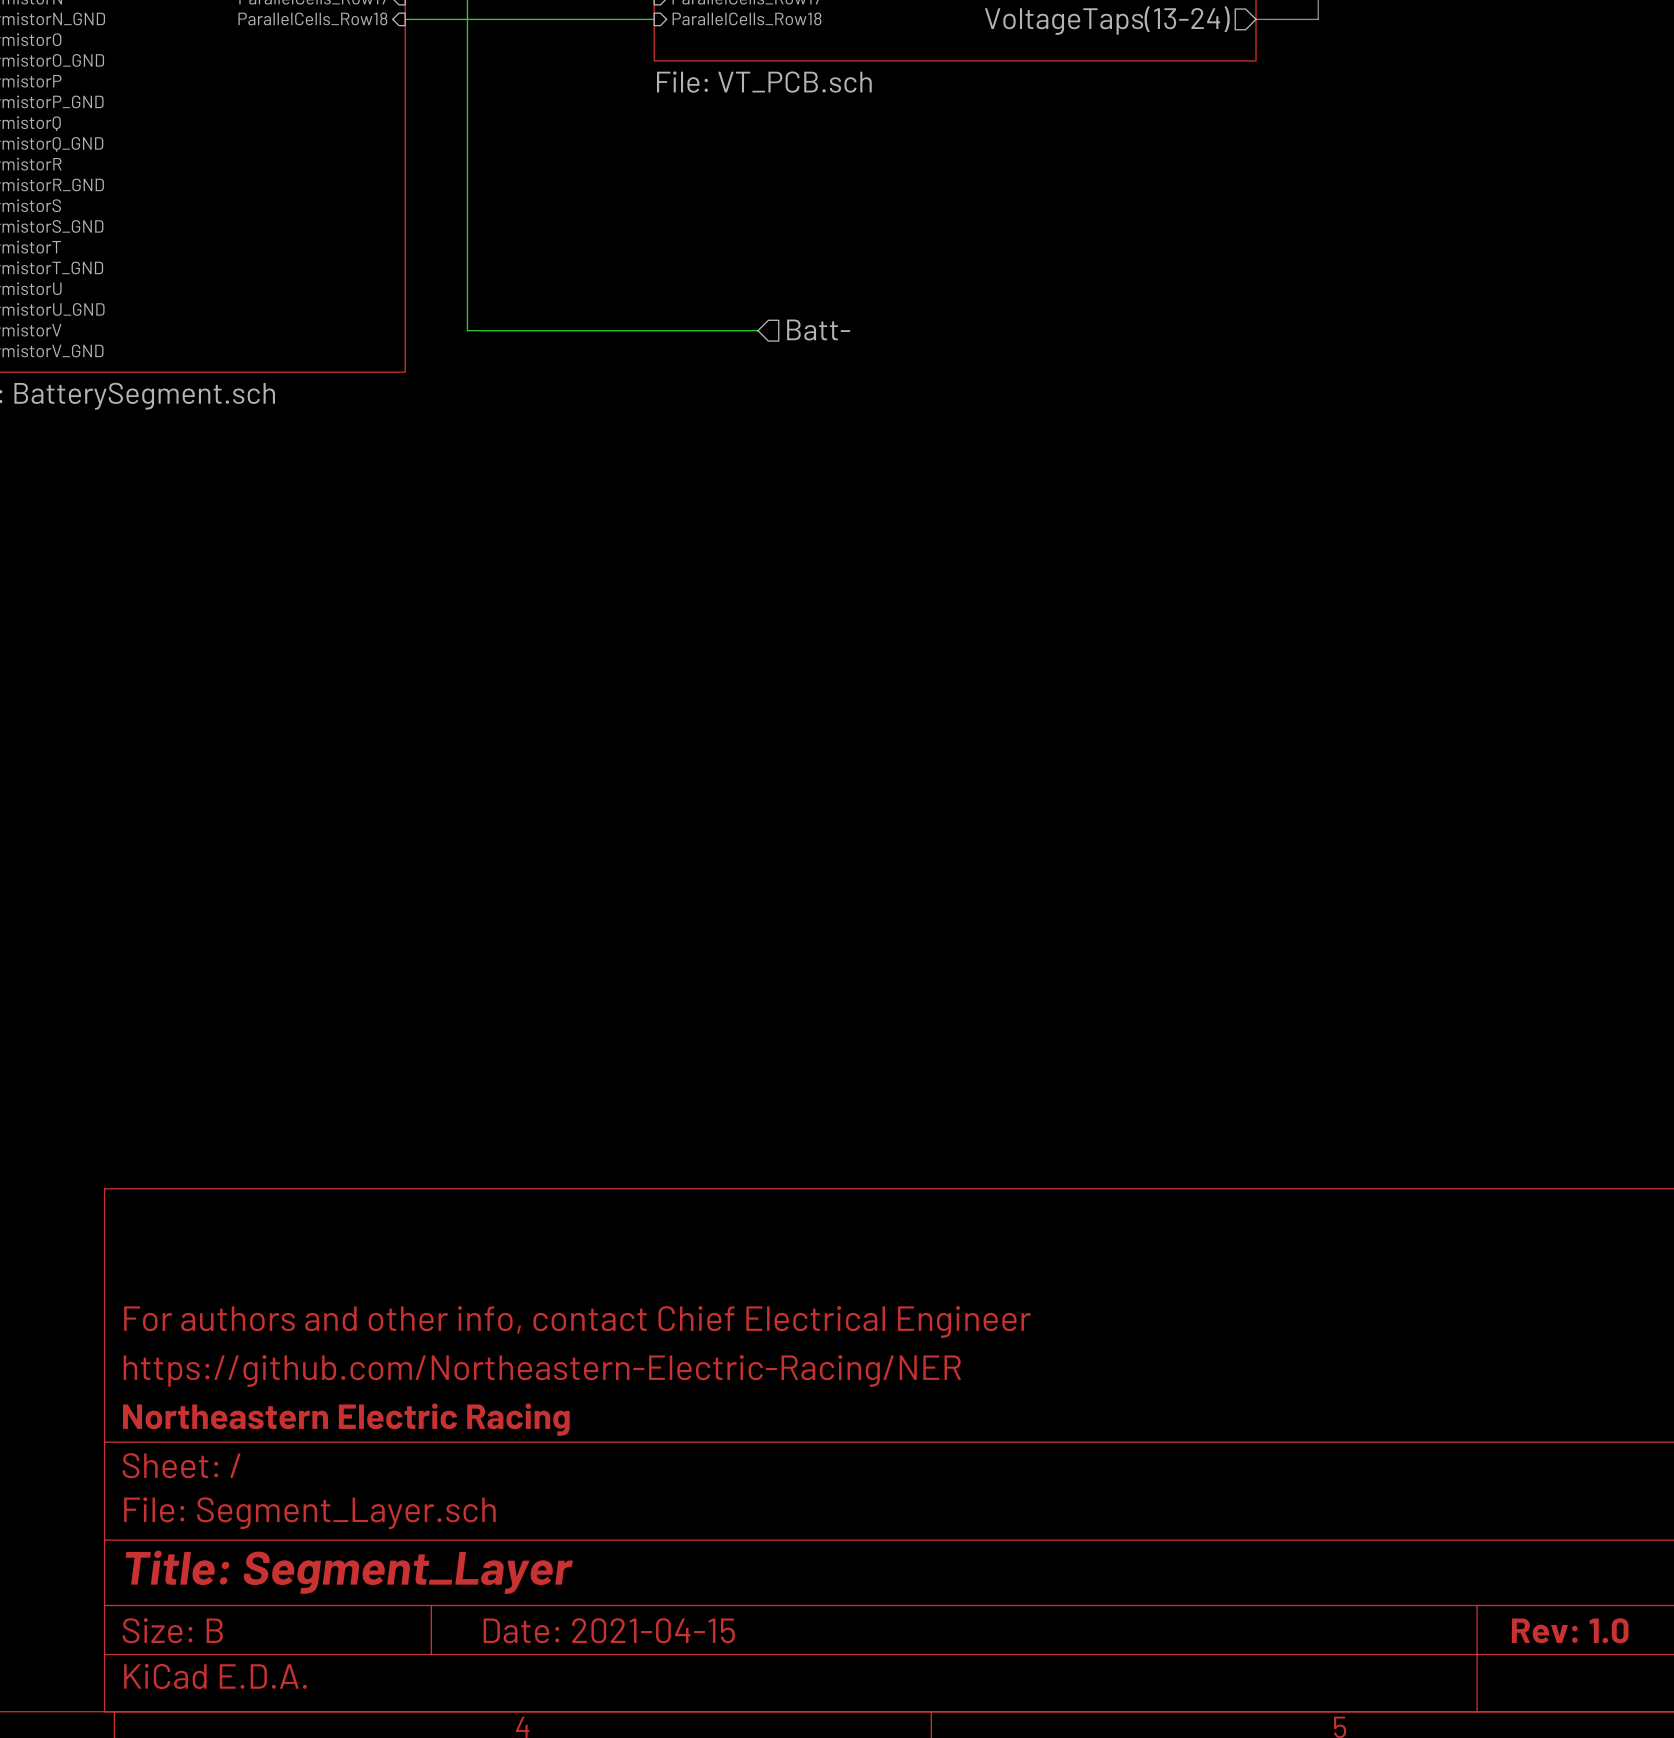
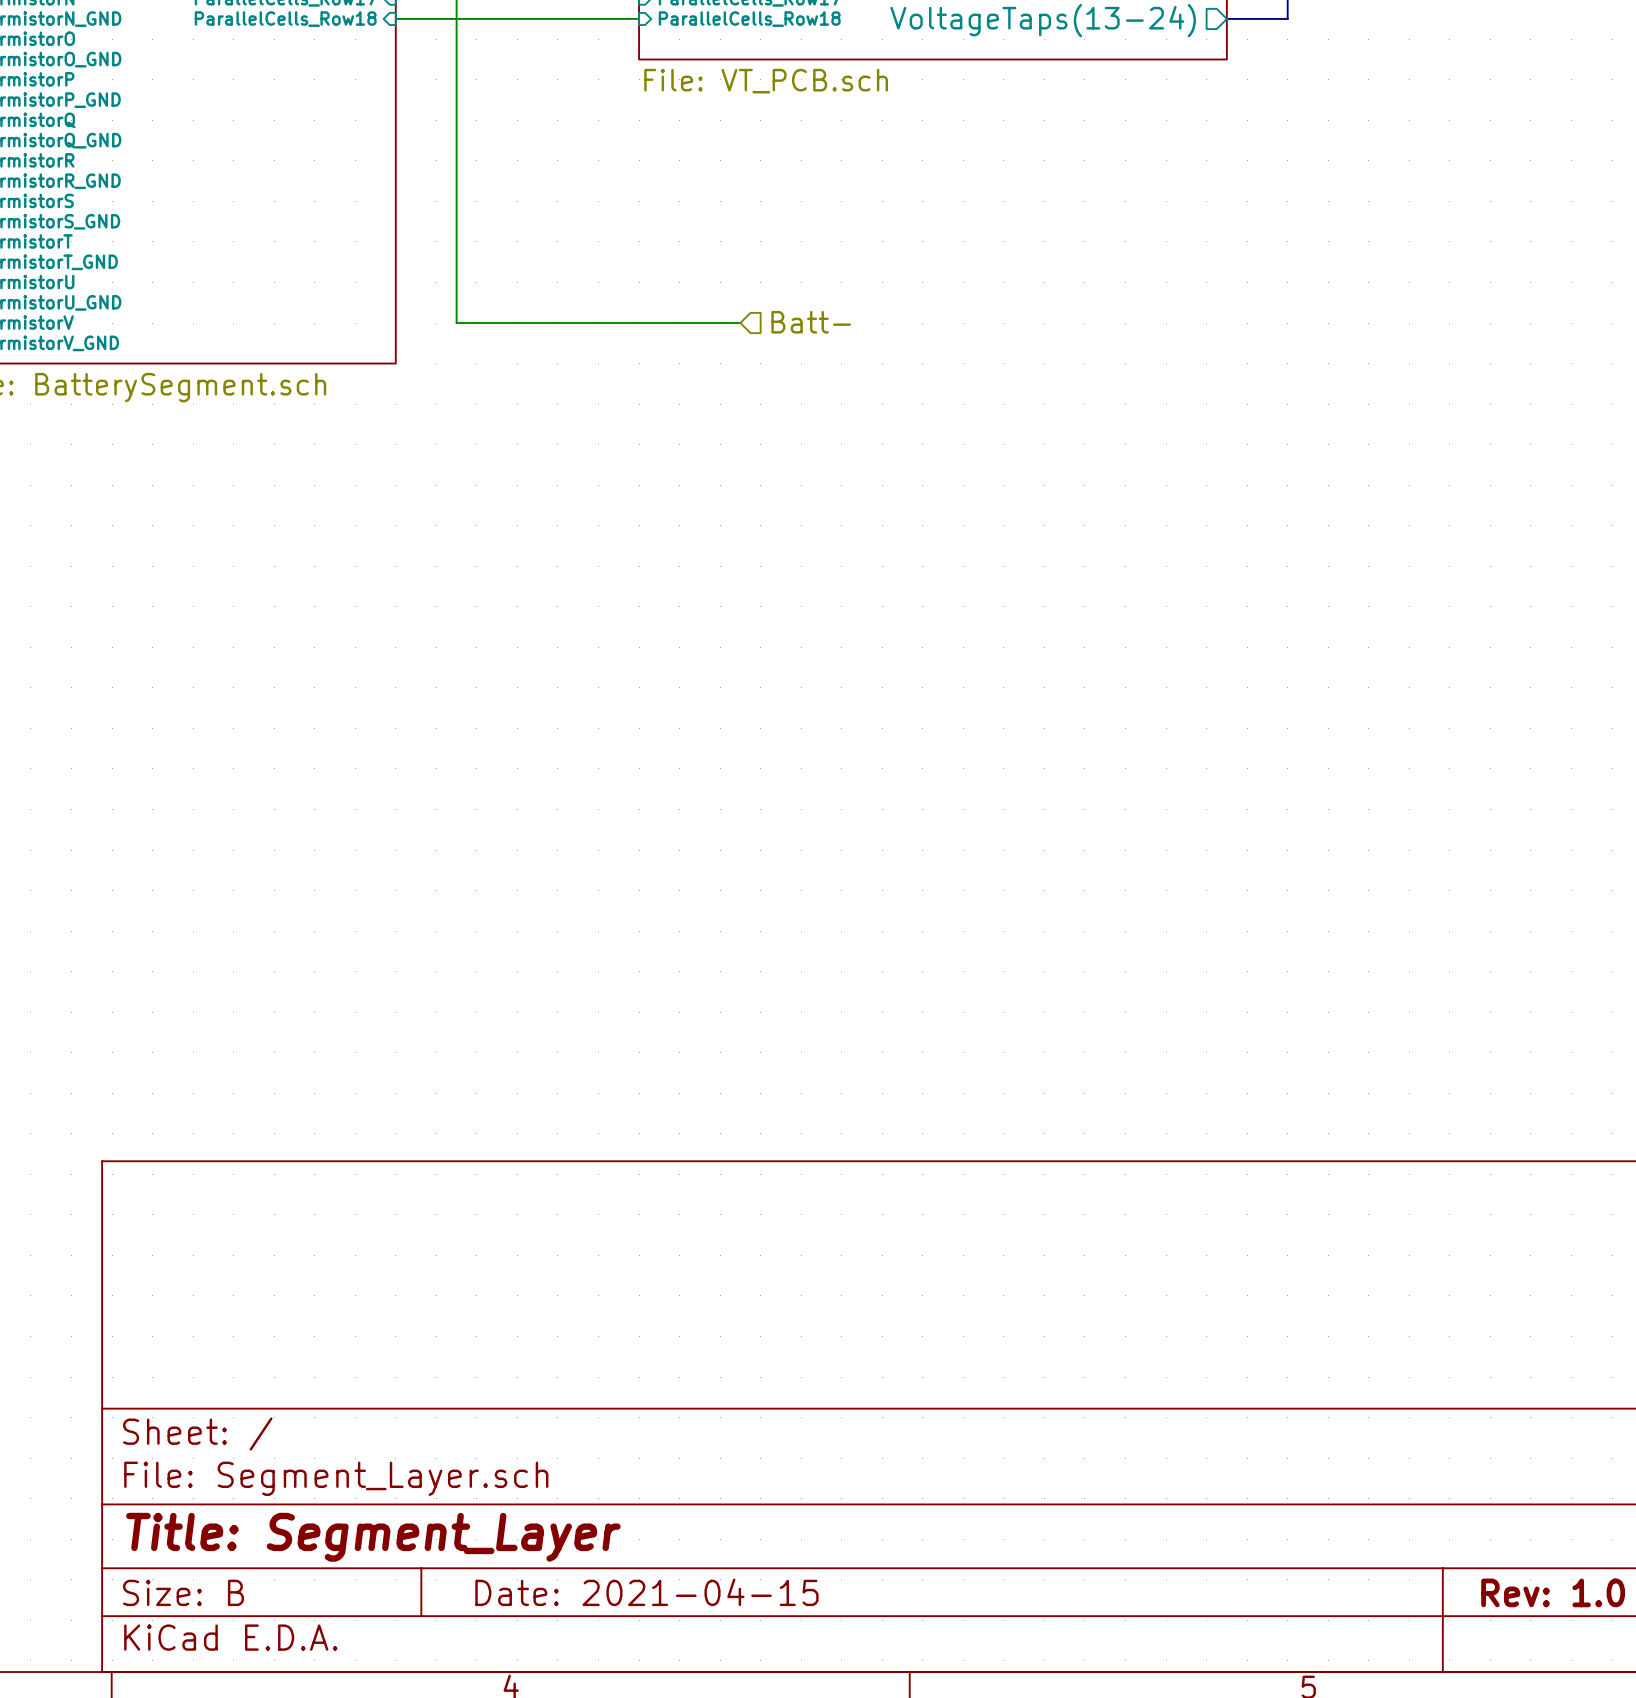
title block: For authors and other info, contact Chief Electrical Engineer (577, 1321) -> none
title block: https://github.com/Northeastern-Electric-Racing/NER (542, 1370) -> none
title block: Northeastern Electric Racing (346, 1419) -> none

